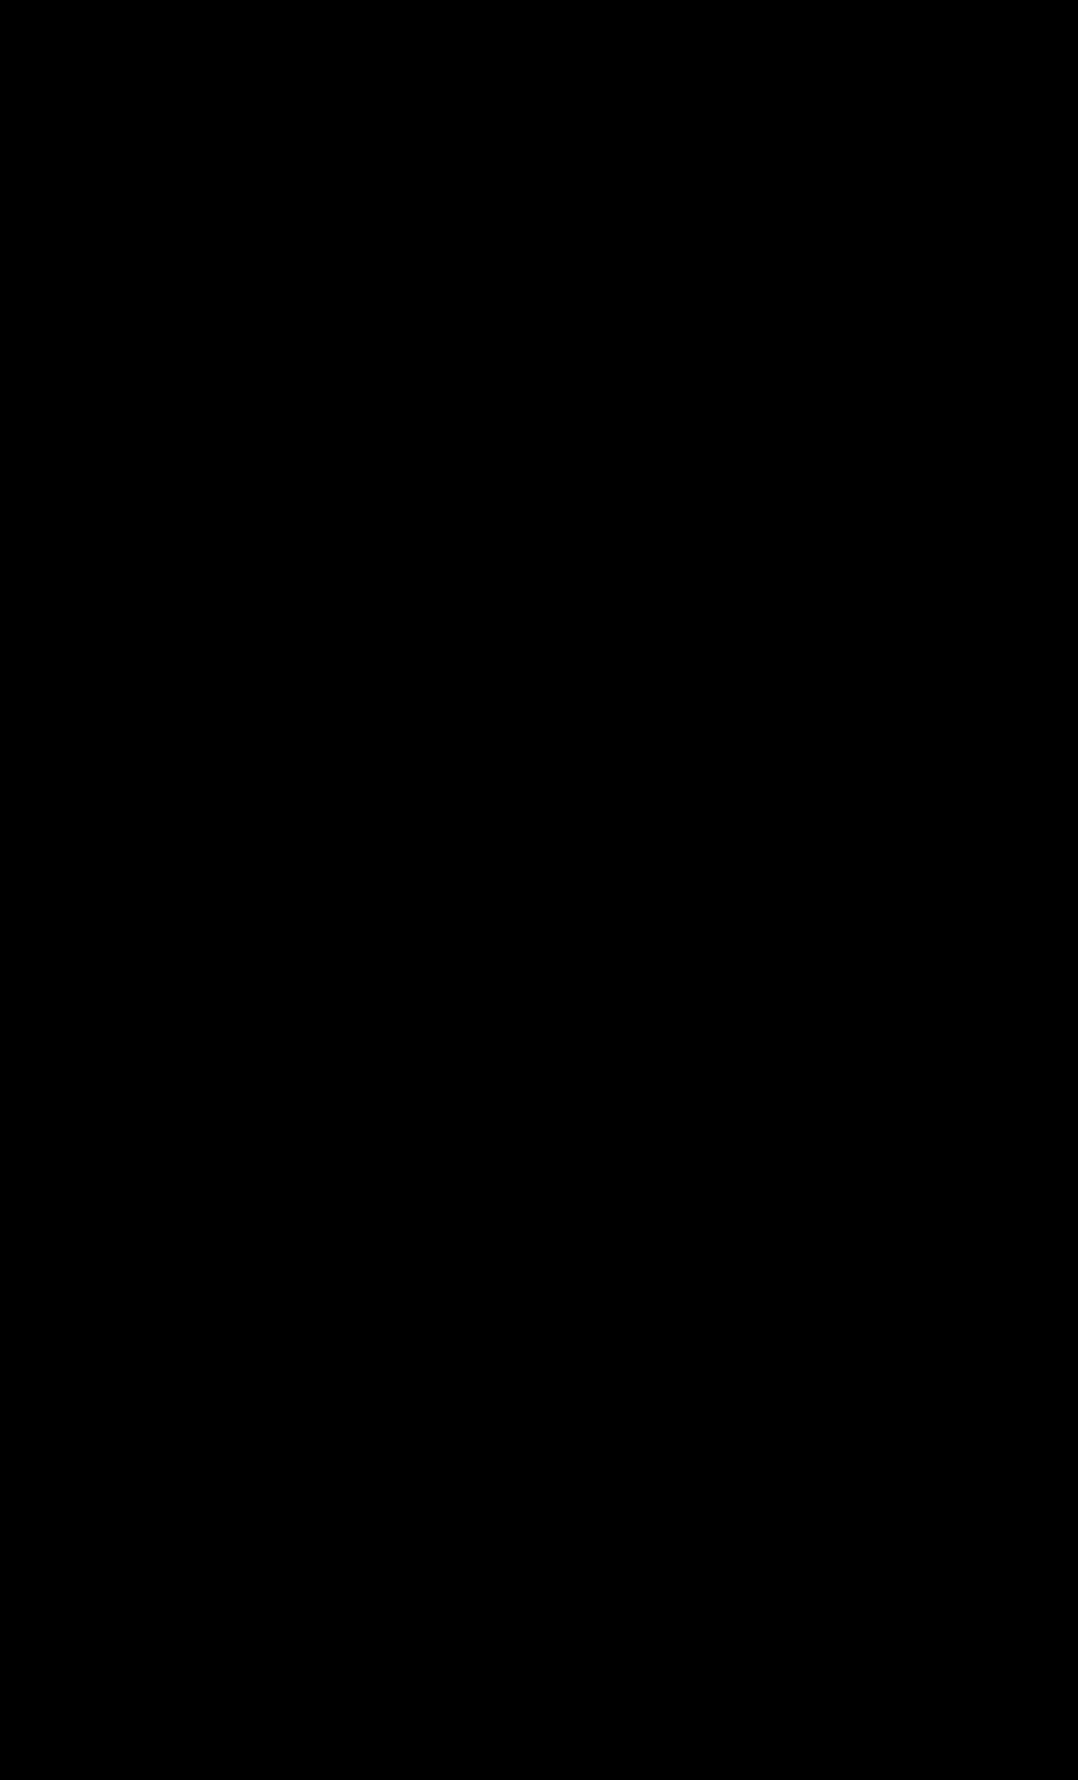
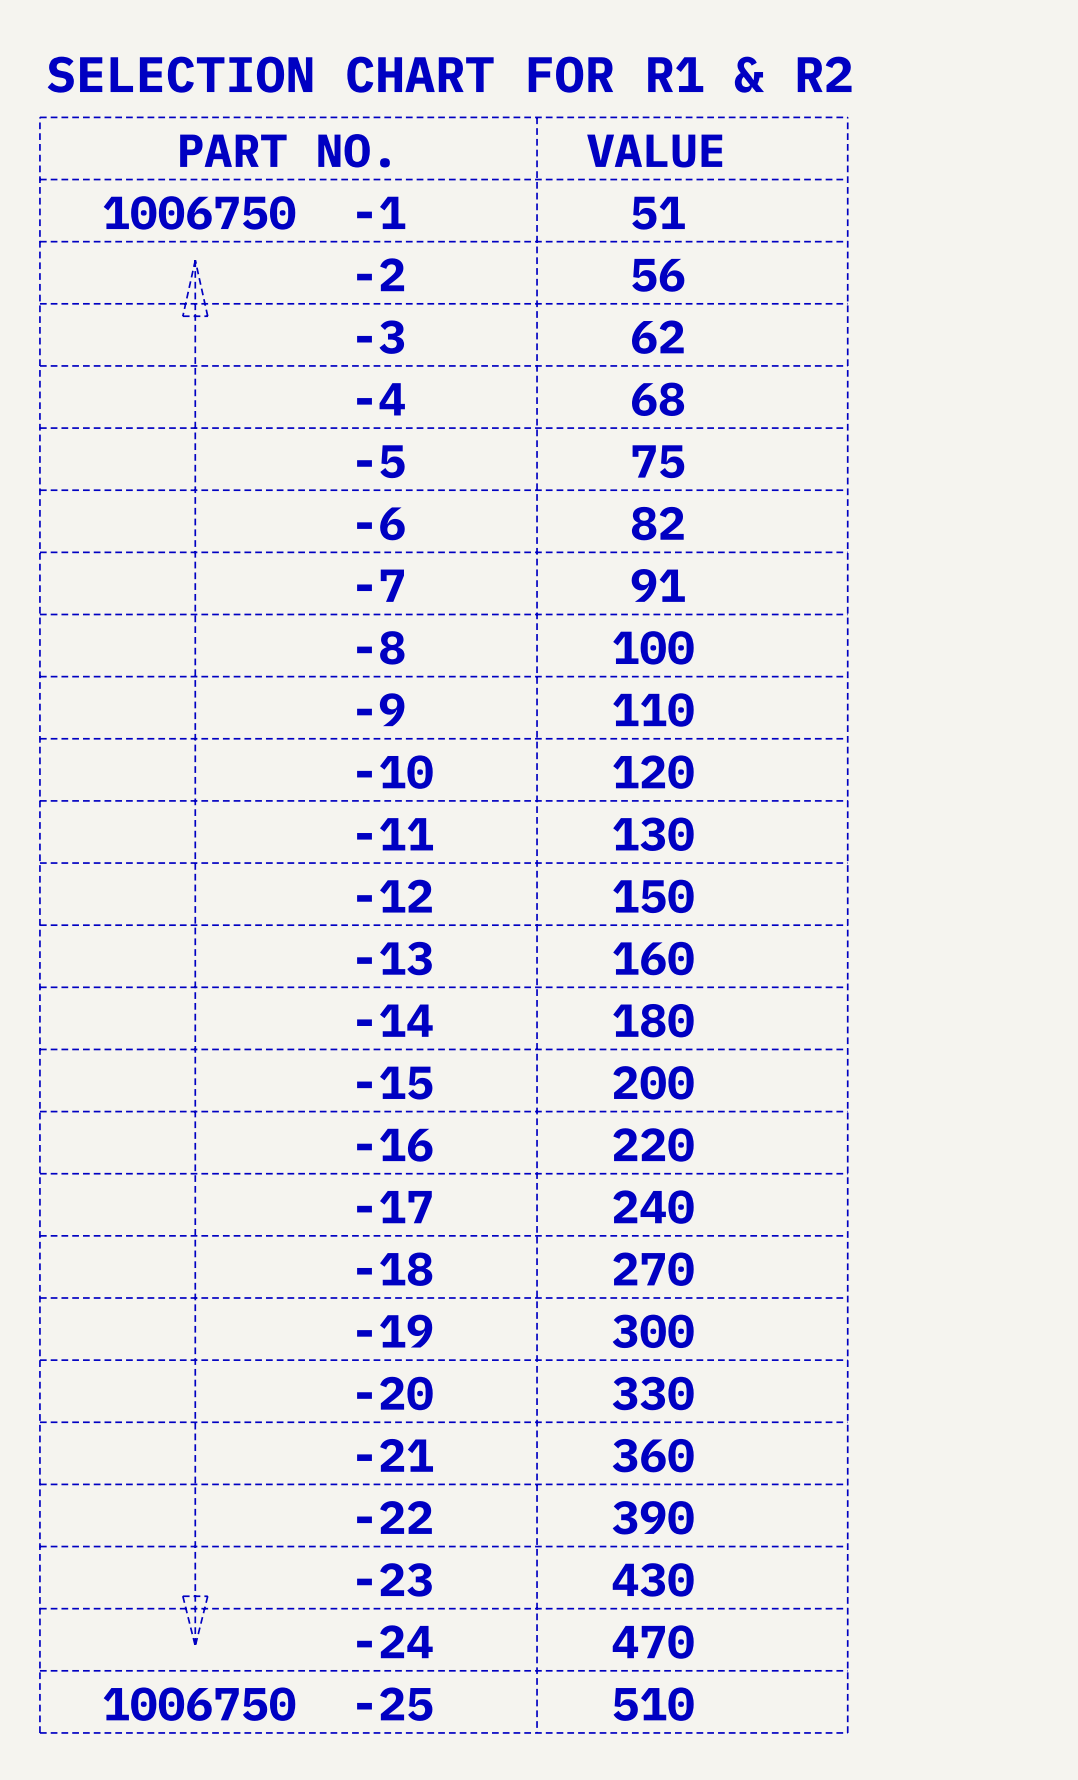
text: none -> SELECTION CHART FOR R1 & R2 (449, 74)
line: none -> (39, 117) (847, 117) (847, 1732) (39, 1732) (39, 117)
line: none -> (537, 117) (537, 1732)
text: none -> PART NO. (284, 150)
text: none -> VALUE (654, 151)
line: none -> (39, 179) (847, 179)
text: none -> 1006750 (199, 212)
text: none -> -1 (381, 212)
text: none -> 51 (658, 213)
line: none -> (39, 241) (847, 241)
line: none -> (195, 260) (195, 1645)
line: none -> (195, 260) (182, 316) (207, 316) (195, 260)
text: none -> -2 (380, 274)
text: none -> 56 (658, 275)
line: none -> (39, 303) (847, 303)
text: none -> -3 (380, 337)
text: none -> 62 (657, 337)
line: none -> (39, 365) (847, 365)
text: none -> -4 (381, 399)
text: none -> 68 (658, 399)
line: none -> (39, 428) (847, 428)
text: none -> -5 (380, 461)
text: none -> 75 (658, 461)
line: none -> (39, 490) (847, 490)
text: none -> -6 (380, 523)
text: none -> 82 (657, 523)
line: none -> (39, 552) (847, 552)
text: none -> -7 (380, 585)
text: none -> 91 (658, 585)
line: none -> (39, 614) (847, 614)
text: none -> -8 (380, 647)
text: none -> 100 (653, 647)
line: none -> (39, 676) (847, 676)
text: none -> -9 (380, 709)
text: none -> 110 (653, 709)
line: none -> (39, 738) (847, 738)
text: none -> -10 (394, 772)
text: none -> 120 (653, 772)
line: none -> (39, 800) (847, 800)
text: none -> -11 (395, 834)
text: none -> 130 (653, 834)
line: none -> (39, 863) (847, 863)
text: none -> -12 (394, 896)
text: none -> 150 (653, 896)
line: none -> (39, 925) (847, 925)
text: none -> -13 (394, 958)
text: none -> 160 (653, 958)
line: none -> (39, 987) (847, 987)
text: none -> -14 (394, 1020)
text: none -> 180 (653, 1020)
line: none -> (39, 1049) (847, 1049)
text: none -> -15 (394, 1083)
text: none -> 200 (653, 1082)
line: none -> (39, 1111) (847, 1111)
text: none -> -16 (394, 1145)
text: none -> 220 (653, 1144)
line: none -> (39, 1173) (847, 1173)
text: none -> 240 (653, 1207)
text: none -> -17 (394, 1207)
line: none -> (39, 1235) (847, 1235)
text: none -> -18 (394, 1269)
text: none -> 270 (653, 1269)
line: none -> (39, 1297) (847, 1297)
text: none -> -19 (394, 1331)
text: none -> 300 (653, 1331)
line: none -> (39, 1360) (847, 1360)
text: none -> -20 (394, 1393)
text: none -> 330 (653, 1393)
line: none -> (39, 1422) (847, 1422)
text: none -> -21 (395, 1455)
text: none -> 360 (653, 1455)
line: none -> (39, 1484) (847, 1484)
text: none -> -22 (394, 1517)
text: none -> 390 (653, 1517)
line: none -> (39, 1546) (847, 1546)
text: none -> -23 (394, 1579)
text: none -> 430 (653, 1579)
line: none -> (39, 1608) (847, 1608)
text: none -> -24 (394, 1641)
text: none -> 470 (653, 1642)
line: none -> (195, 1645) (182, 1596) (207, 1596) (195, 1645)
line: none -> (39, 1670) (847, 1670)
text: none -> 1006750 (199, 1704)
text: none -> -25 (394, 1704)
text: none -> 510 (653, 1704)

